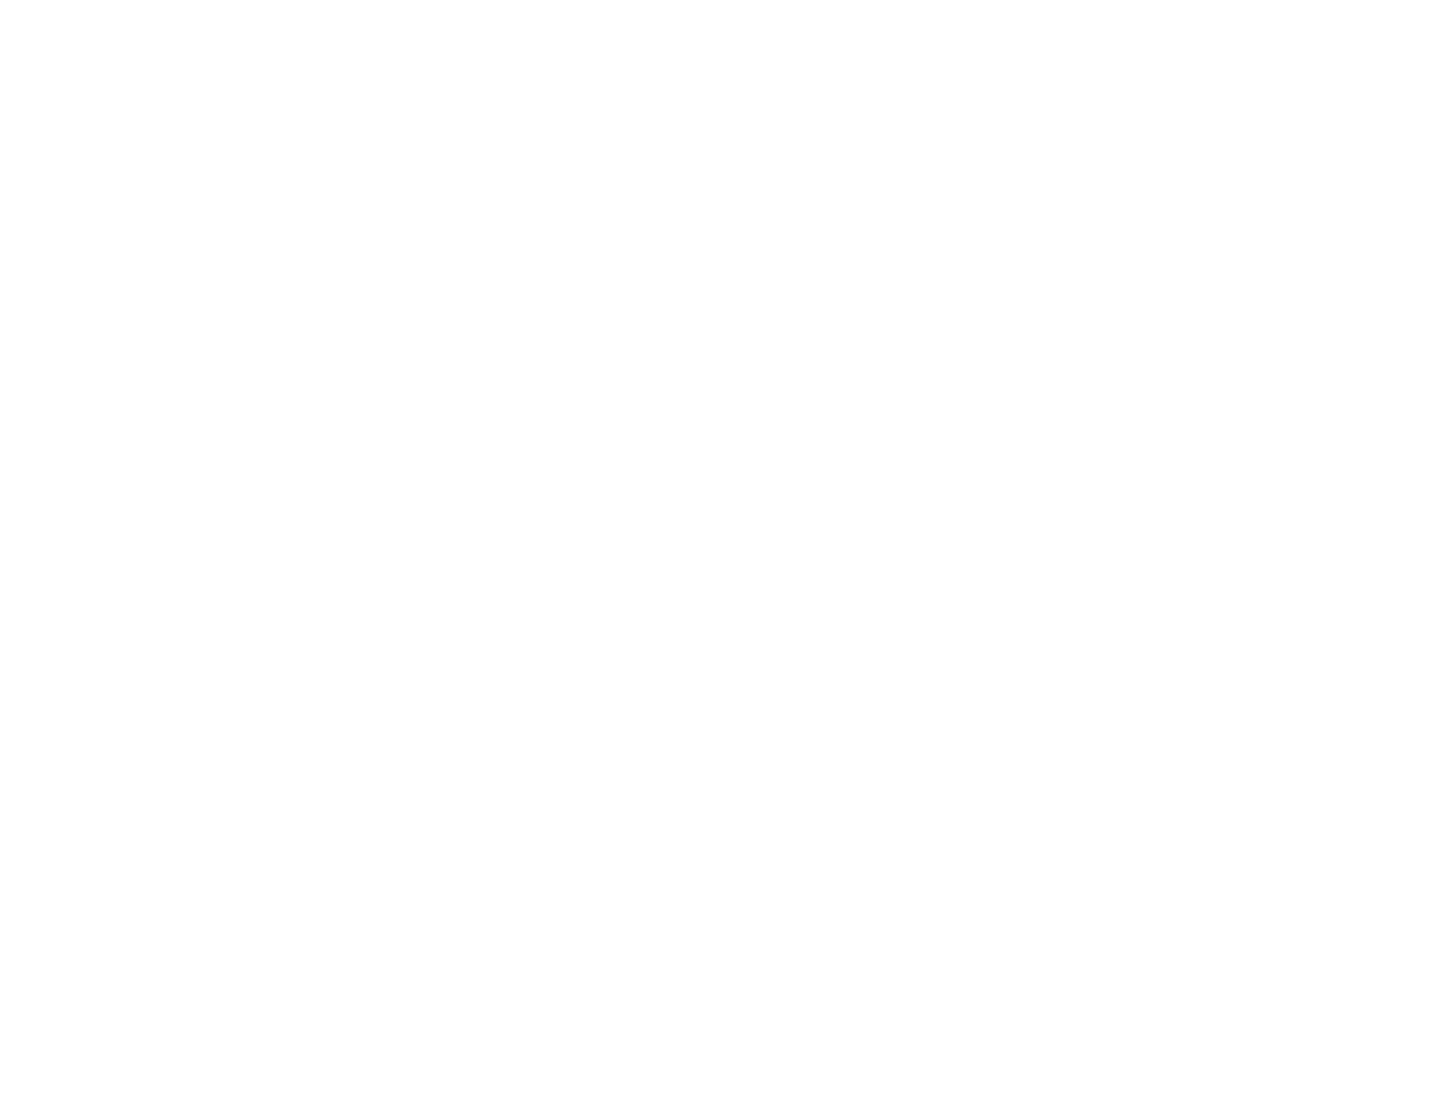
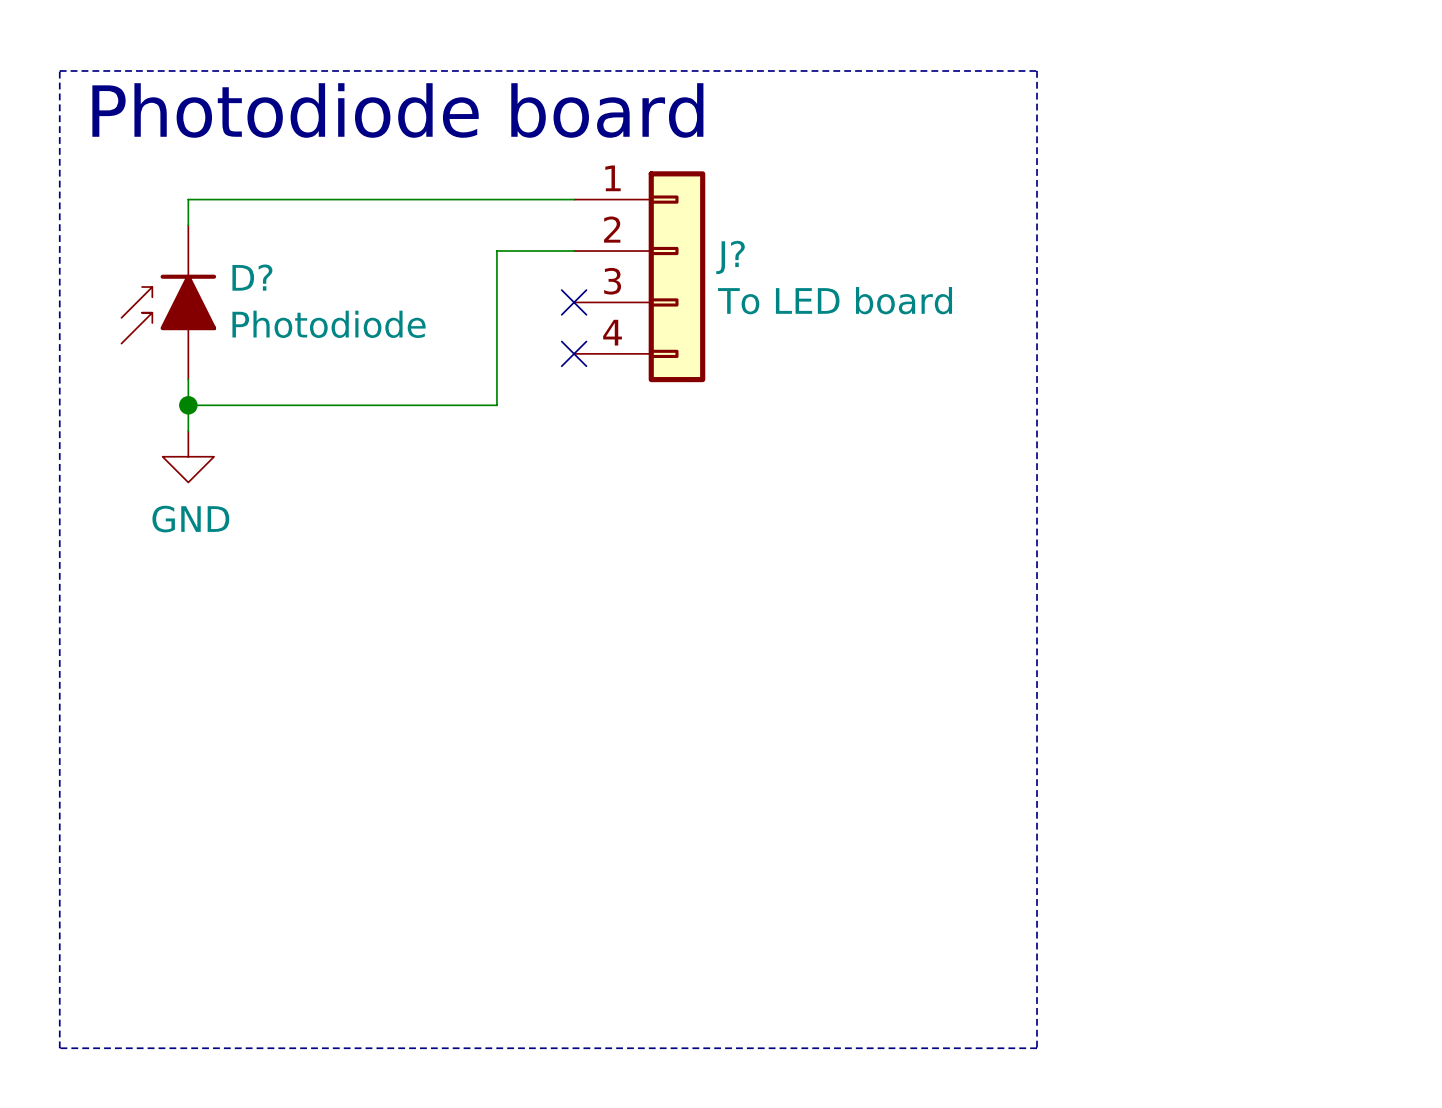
line: none -> (59, 70) (59, 1048) (1037, 1048) (1037, 70) (59, 70)
text: none -> Photodiode board (397, 110)
wire: none -> (574, 199) (188, 199) (188, 225)
wire: none -> (574, 251) (496, 251) (496, 405) (188, 405)
J?: none -> To LED board (639, 276)
D?: none -> Photodiode (168, 302)
no-connect mark: none -> (574, 302)
no-connect mark: none -> (574, 353)
wire: none -> (188, 379) (188, 431)
junction: none -> (188, 405)
power symbol: none -> GND (188, 456)

